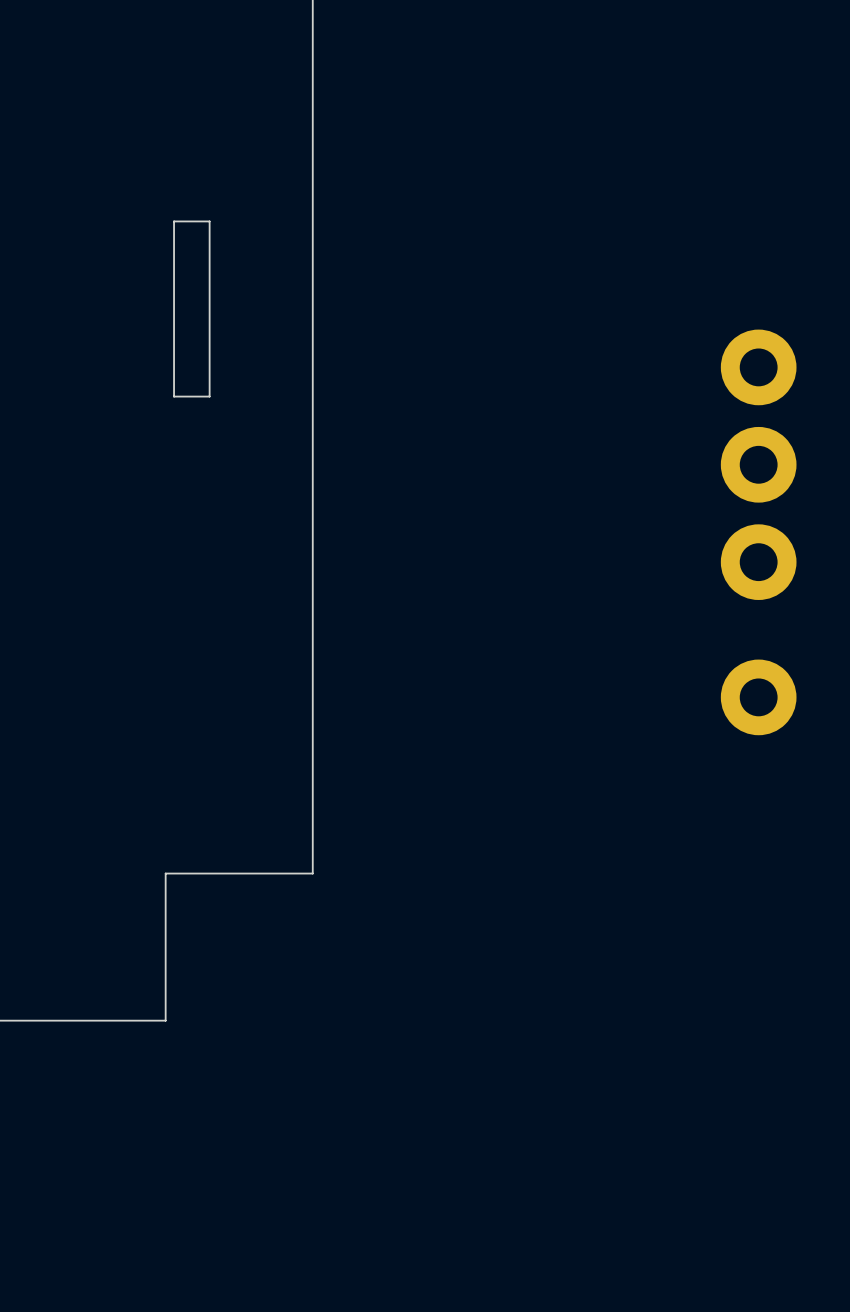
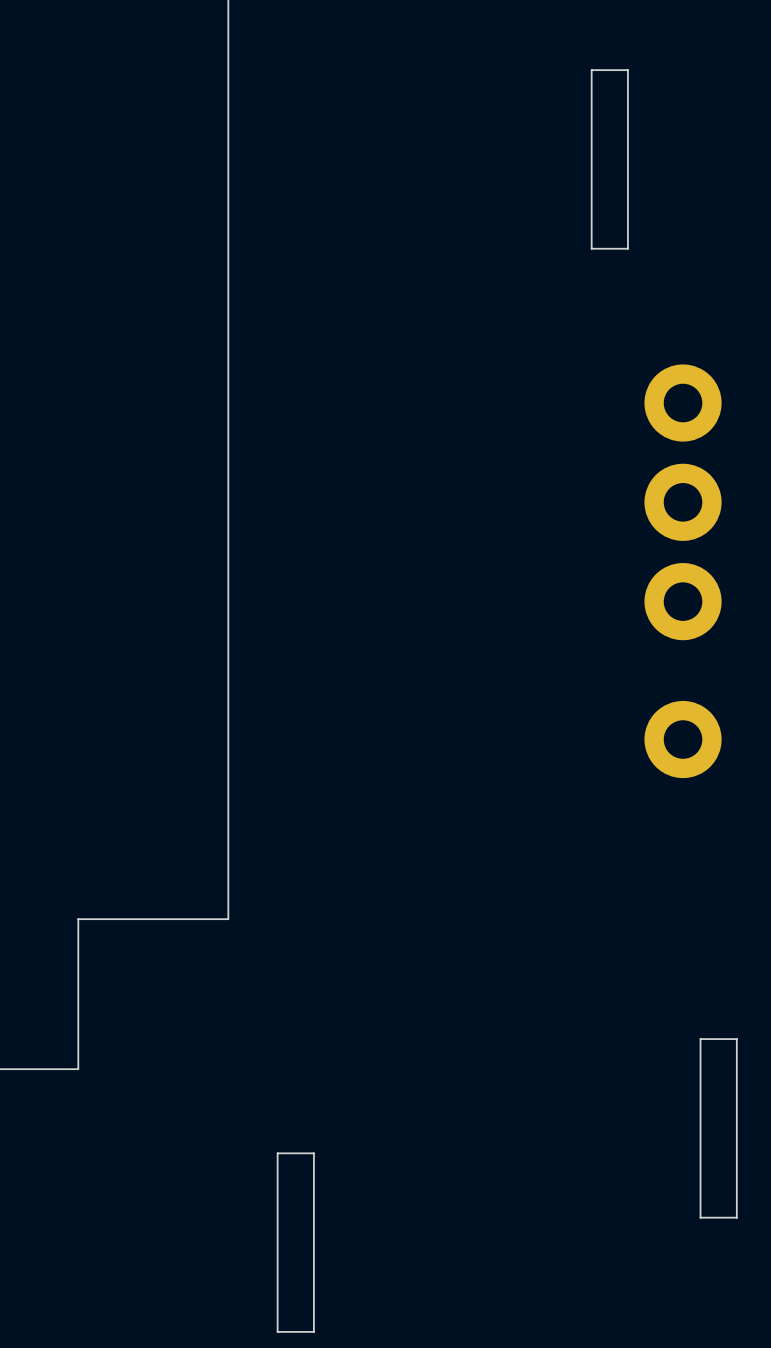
part: none -> (609, 159)
part: (191, 309) -> none
part: none -> (718, 1128)
part: none -> (295, 1242)

